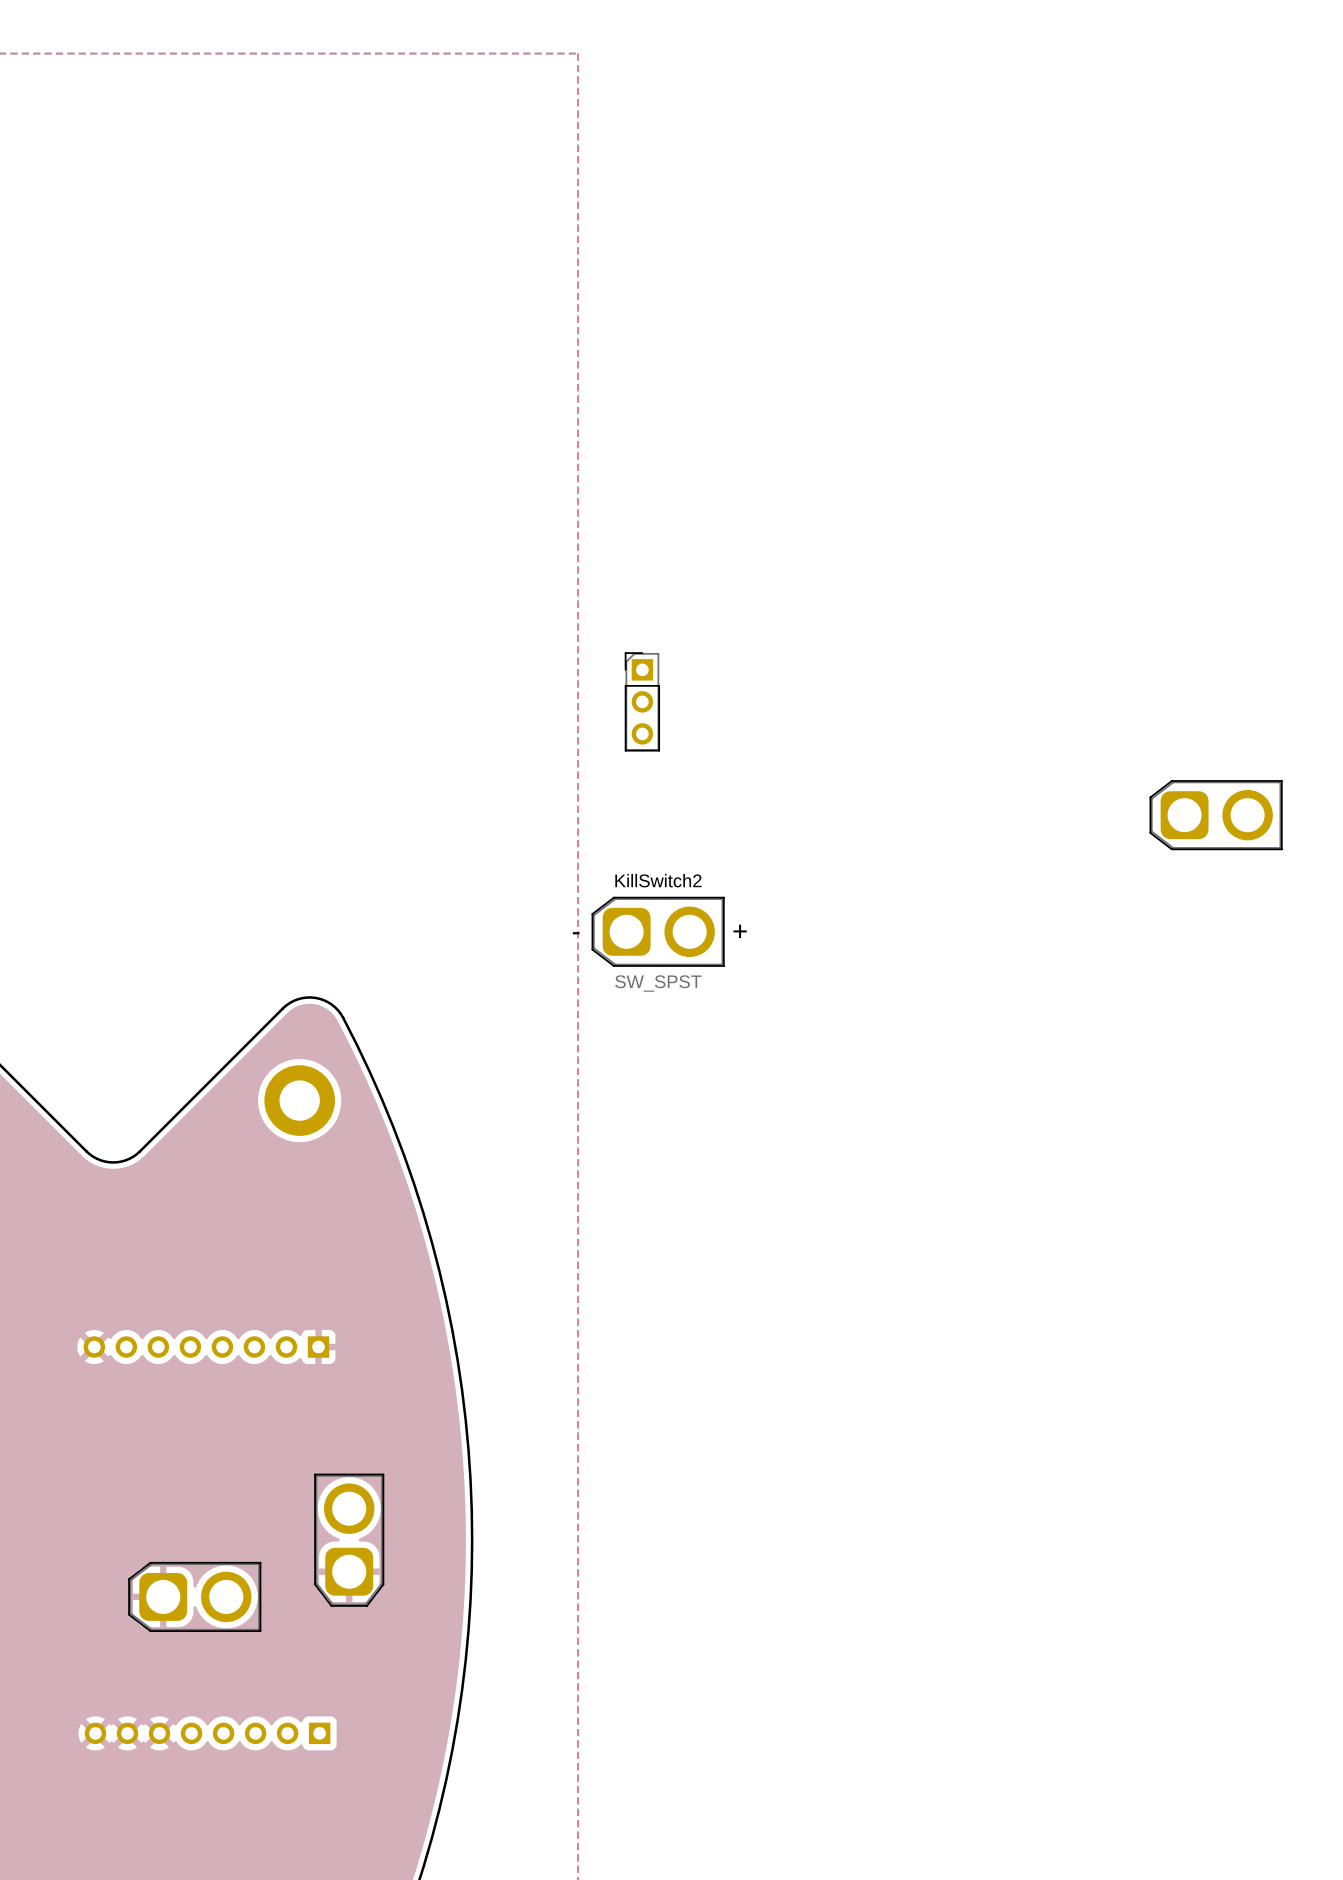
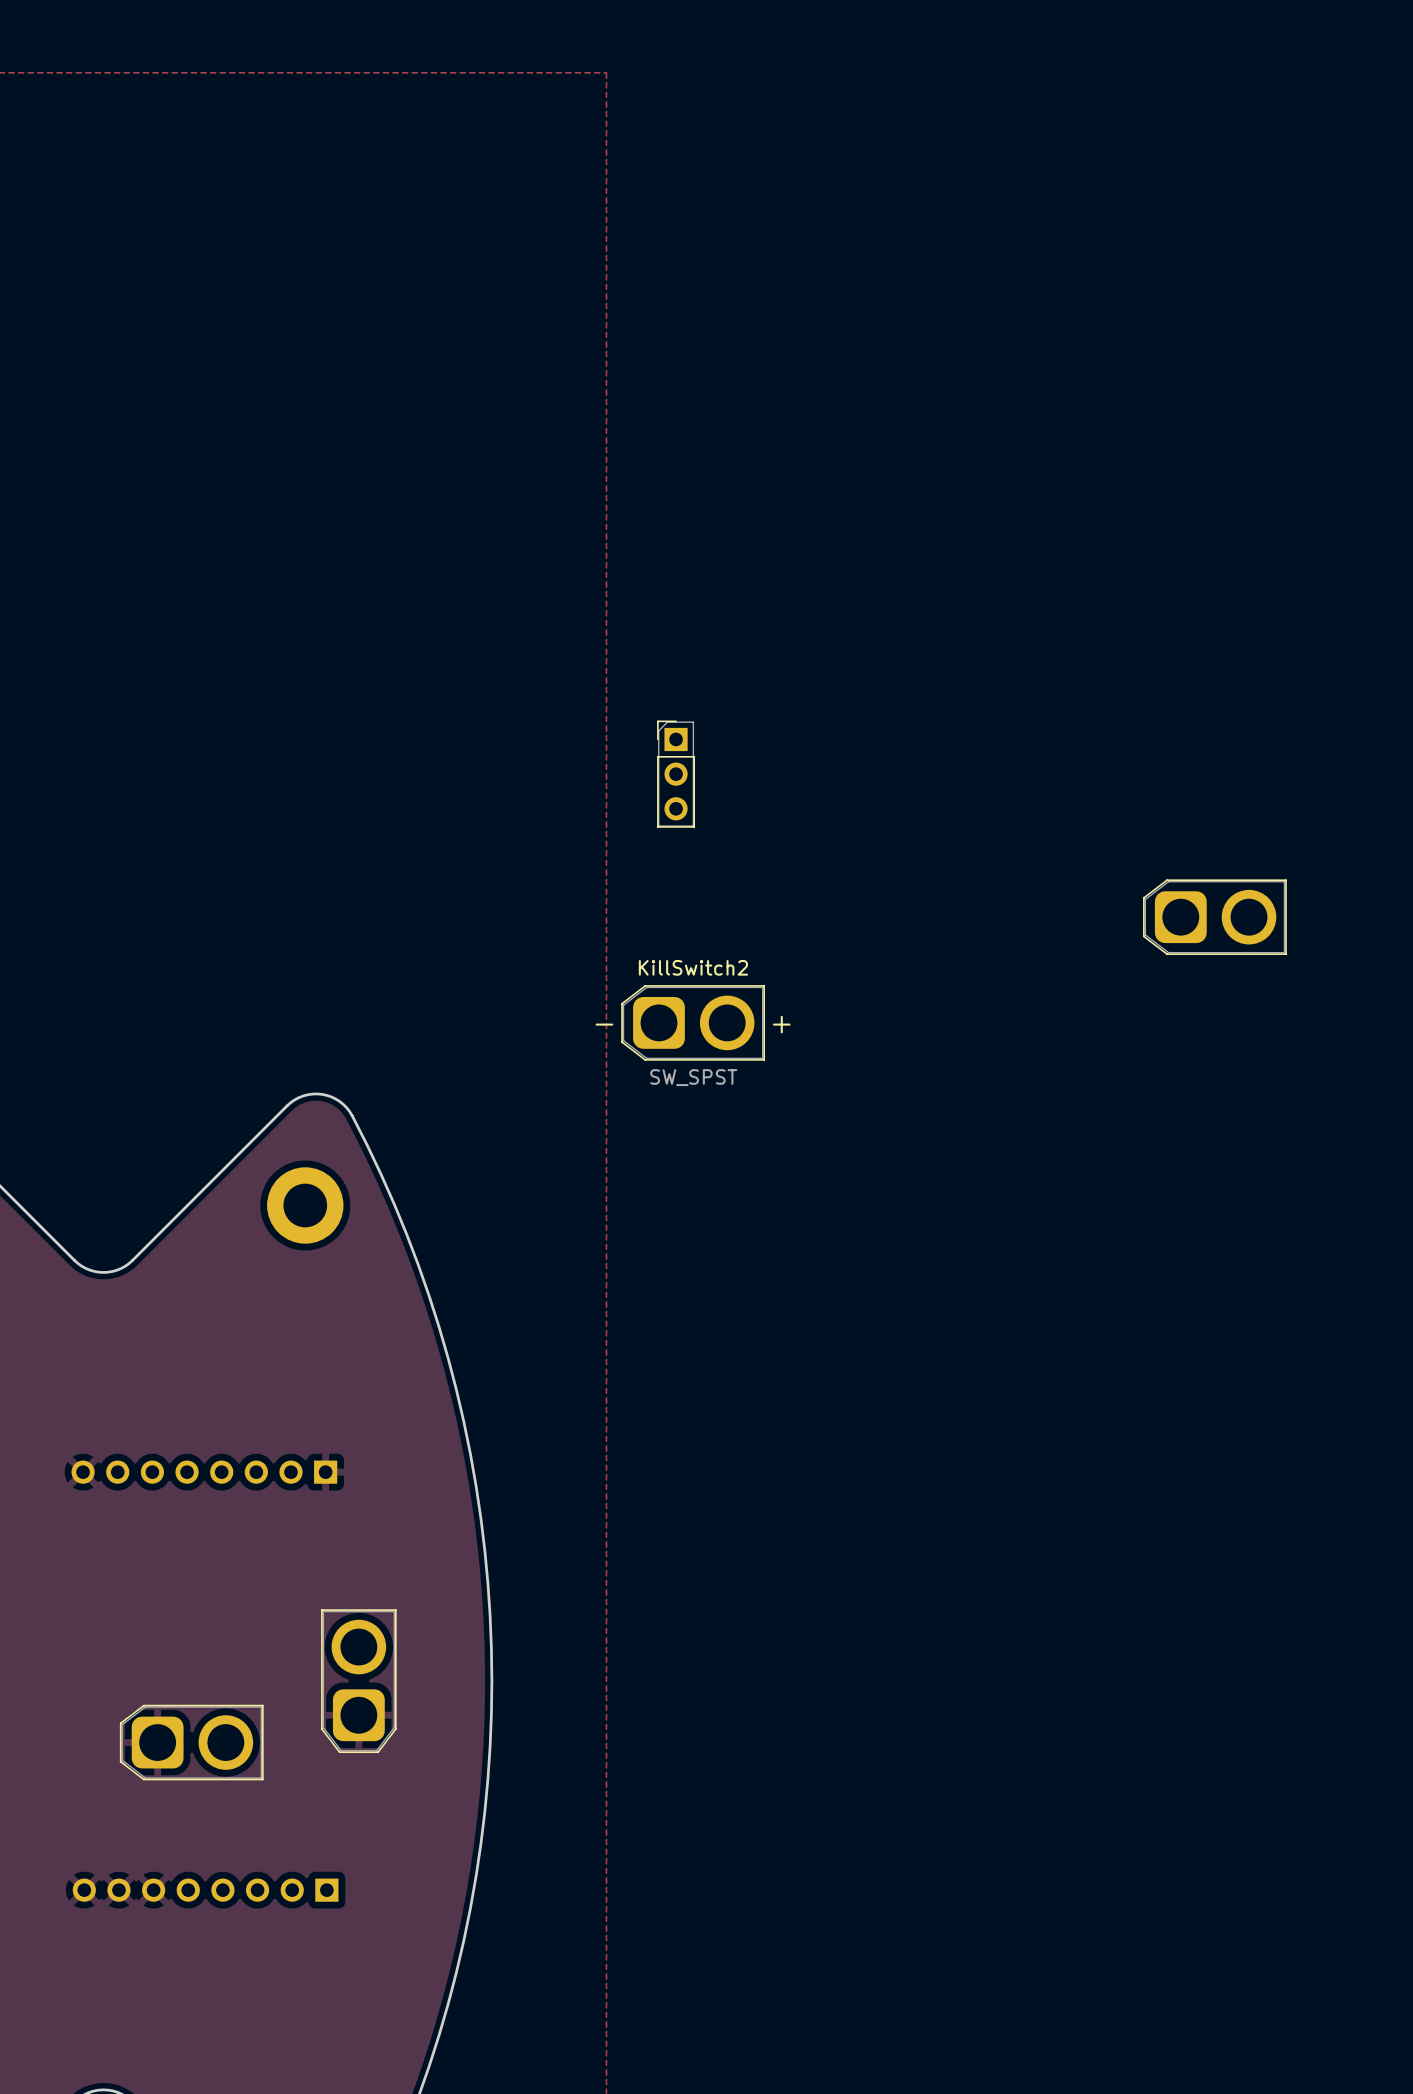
part position: (1216, 815) -> (1214, 917)

